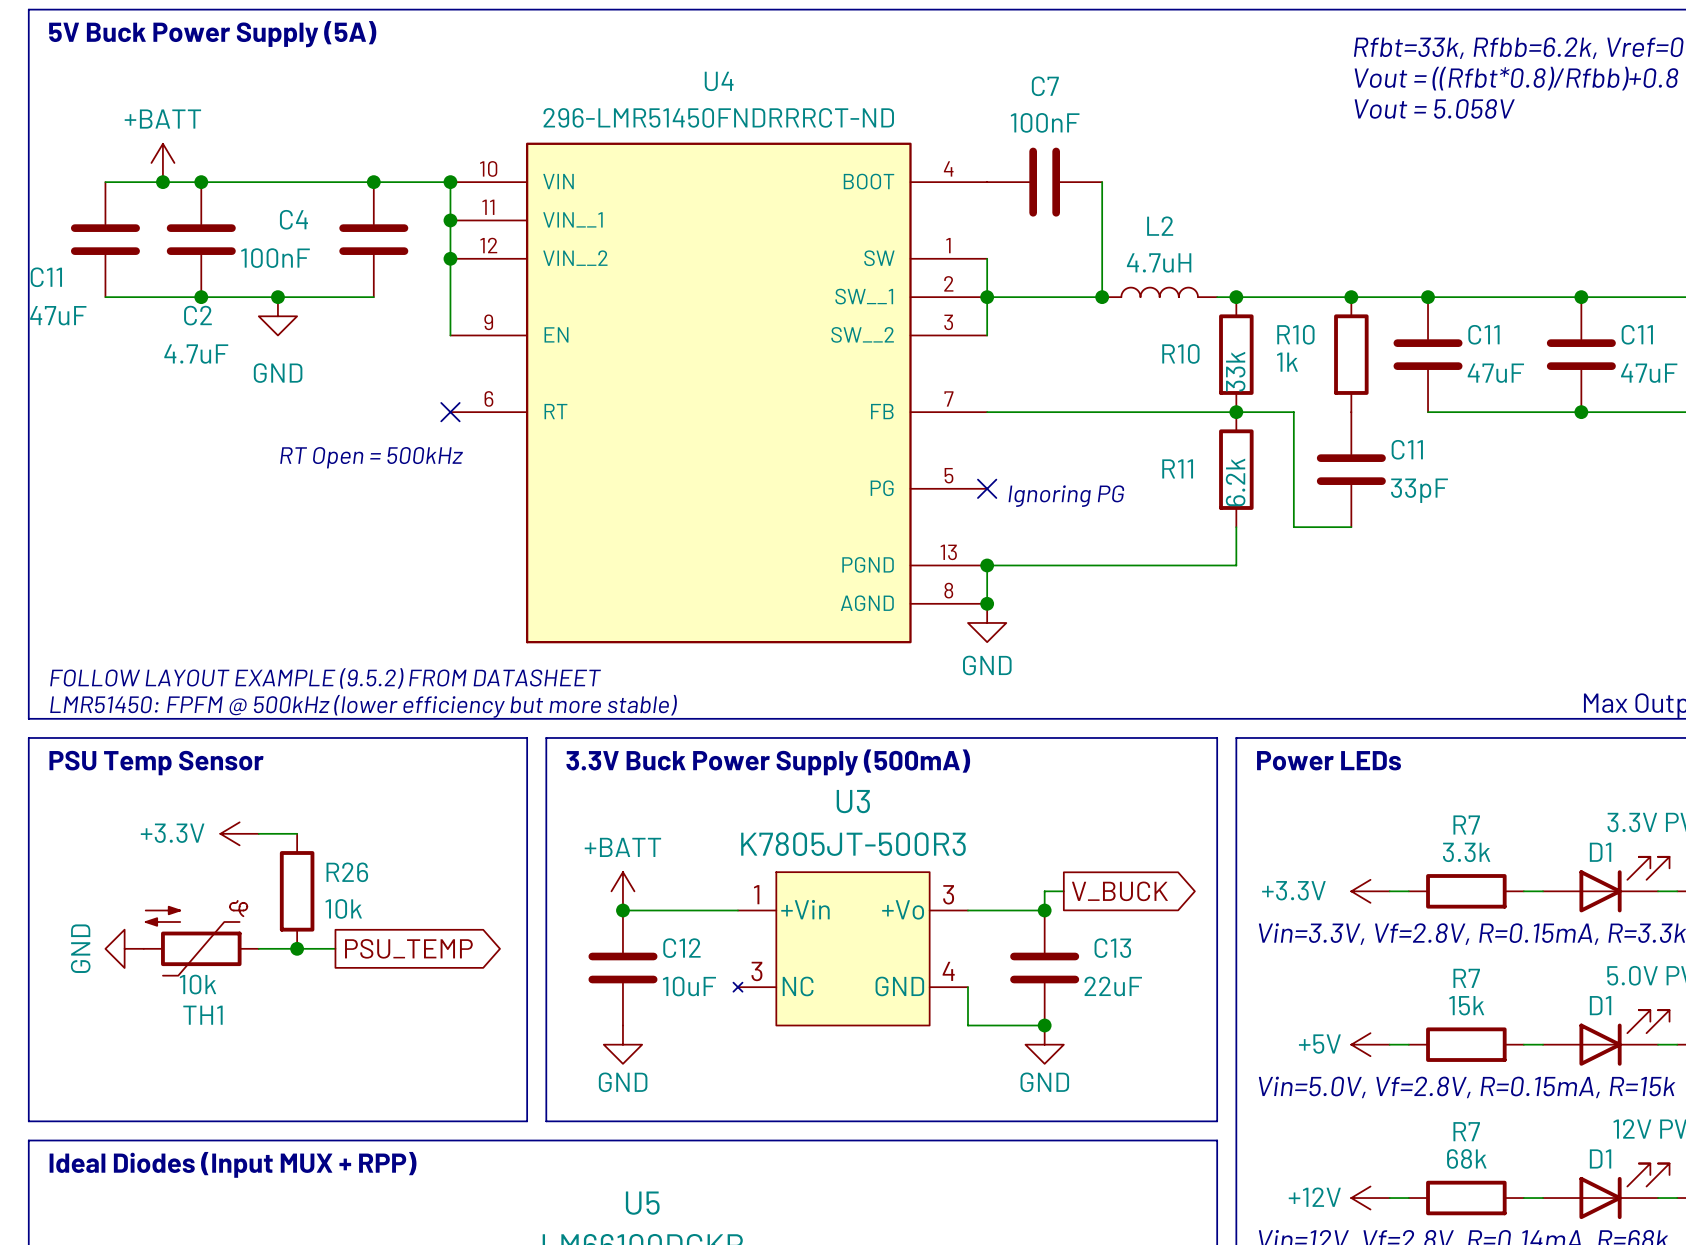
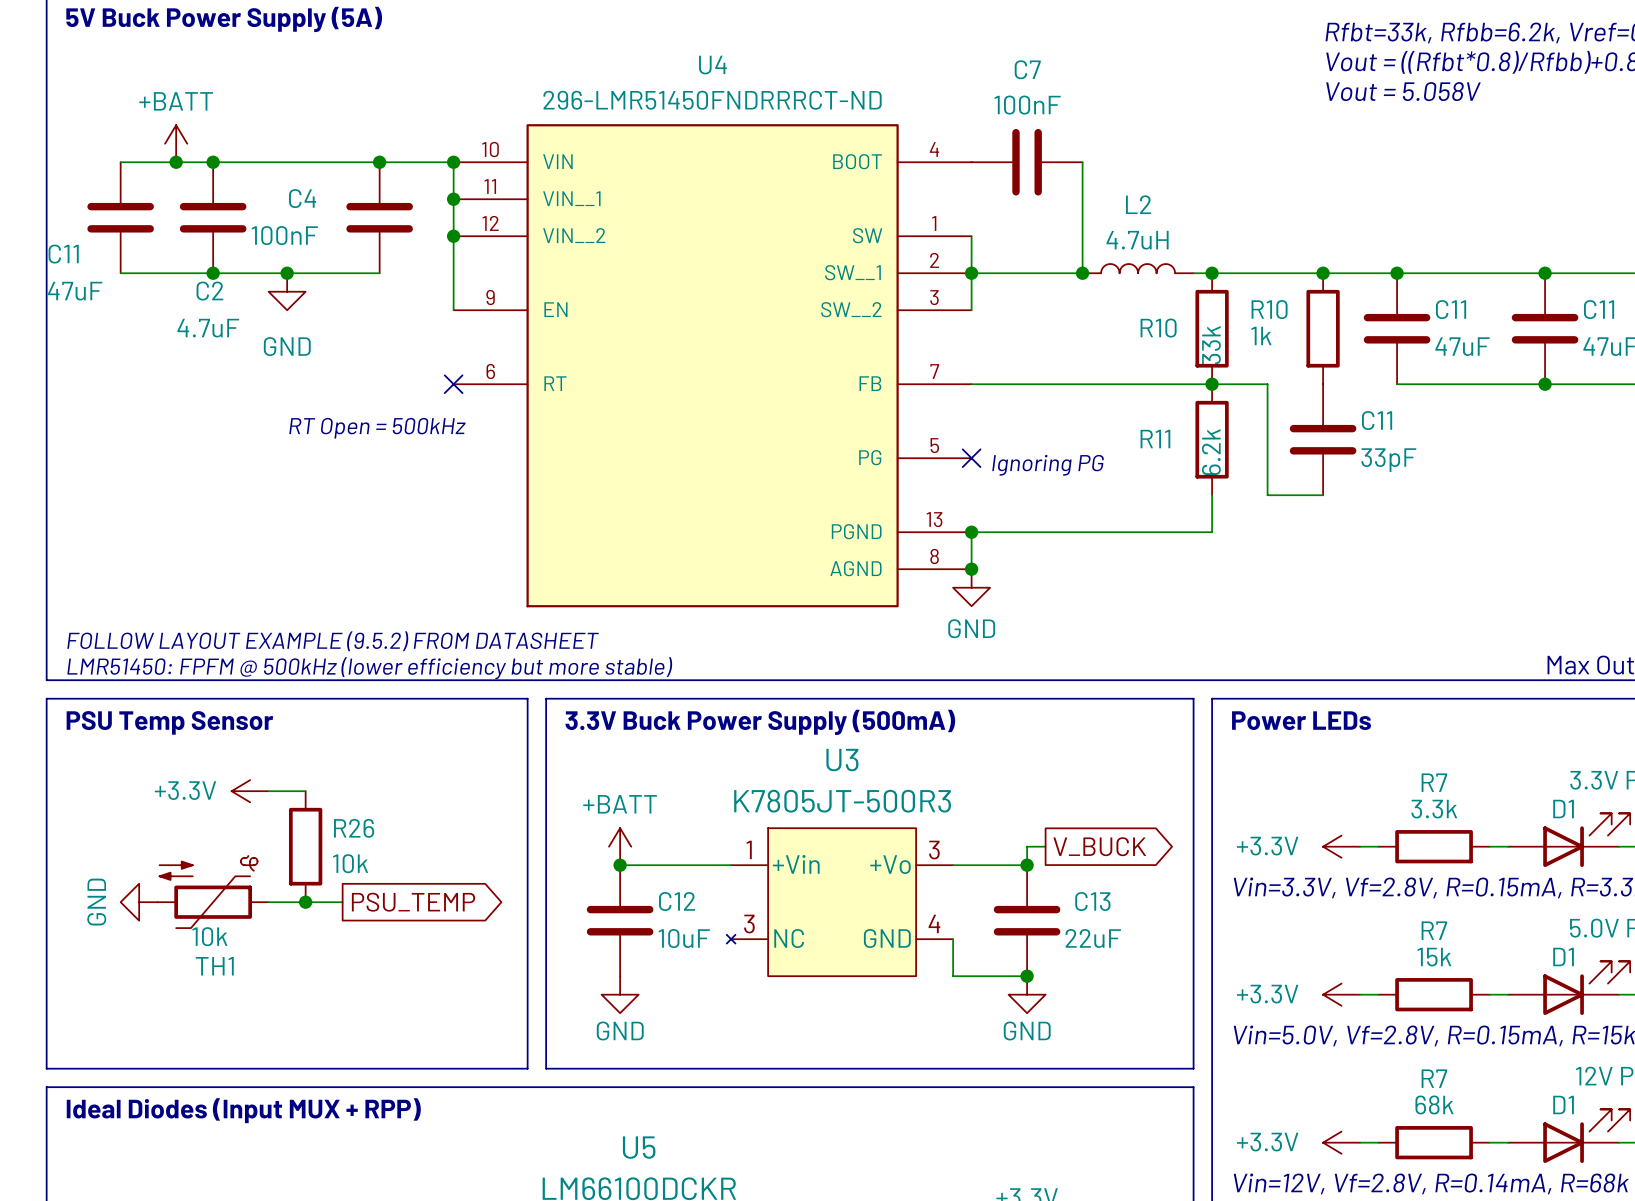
power symbol: +5V (1370, 1044) -> +3.3V (1341, 994)
power symbol: +12V (1370, 1198) -> +3.3V (1341, 1142)

